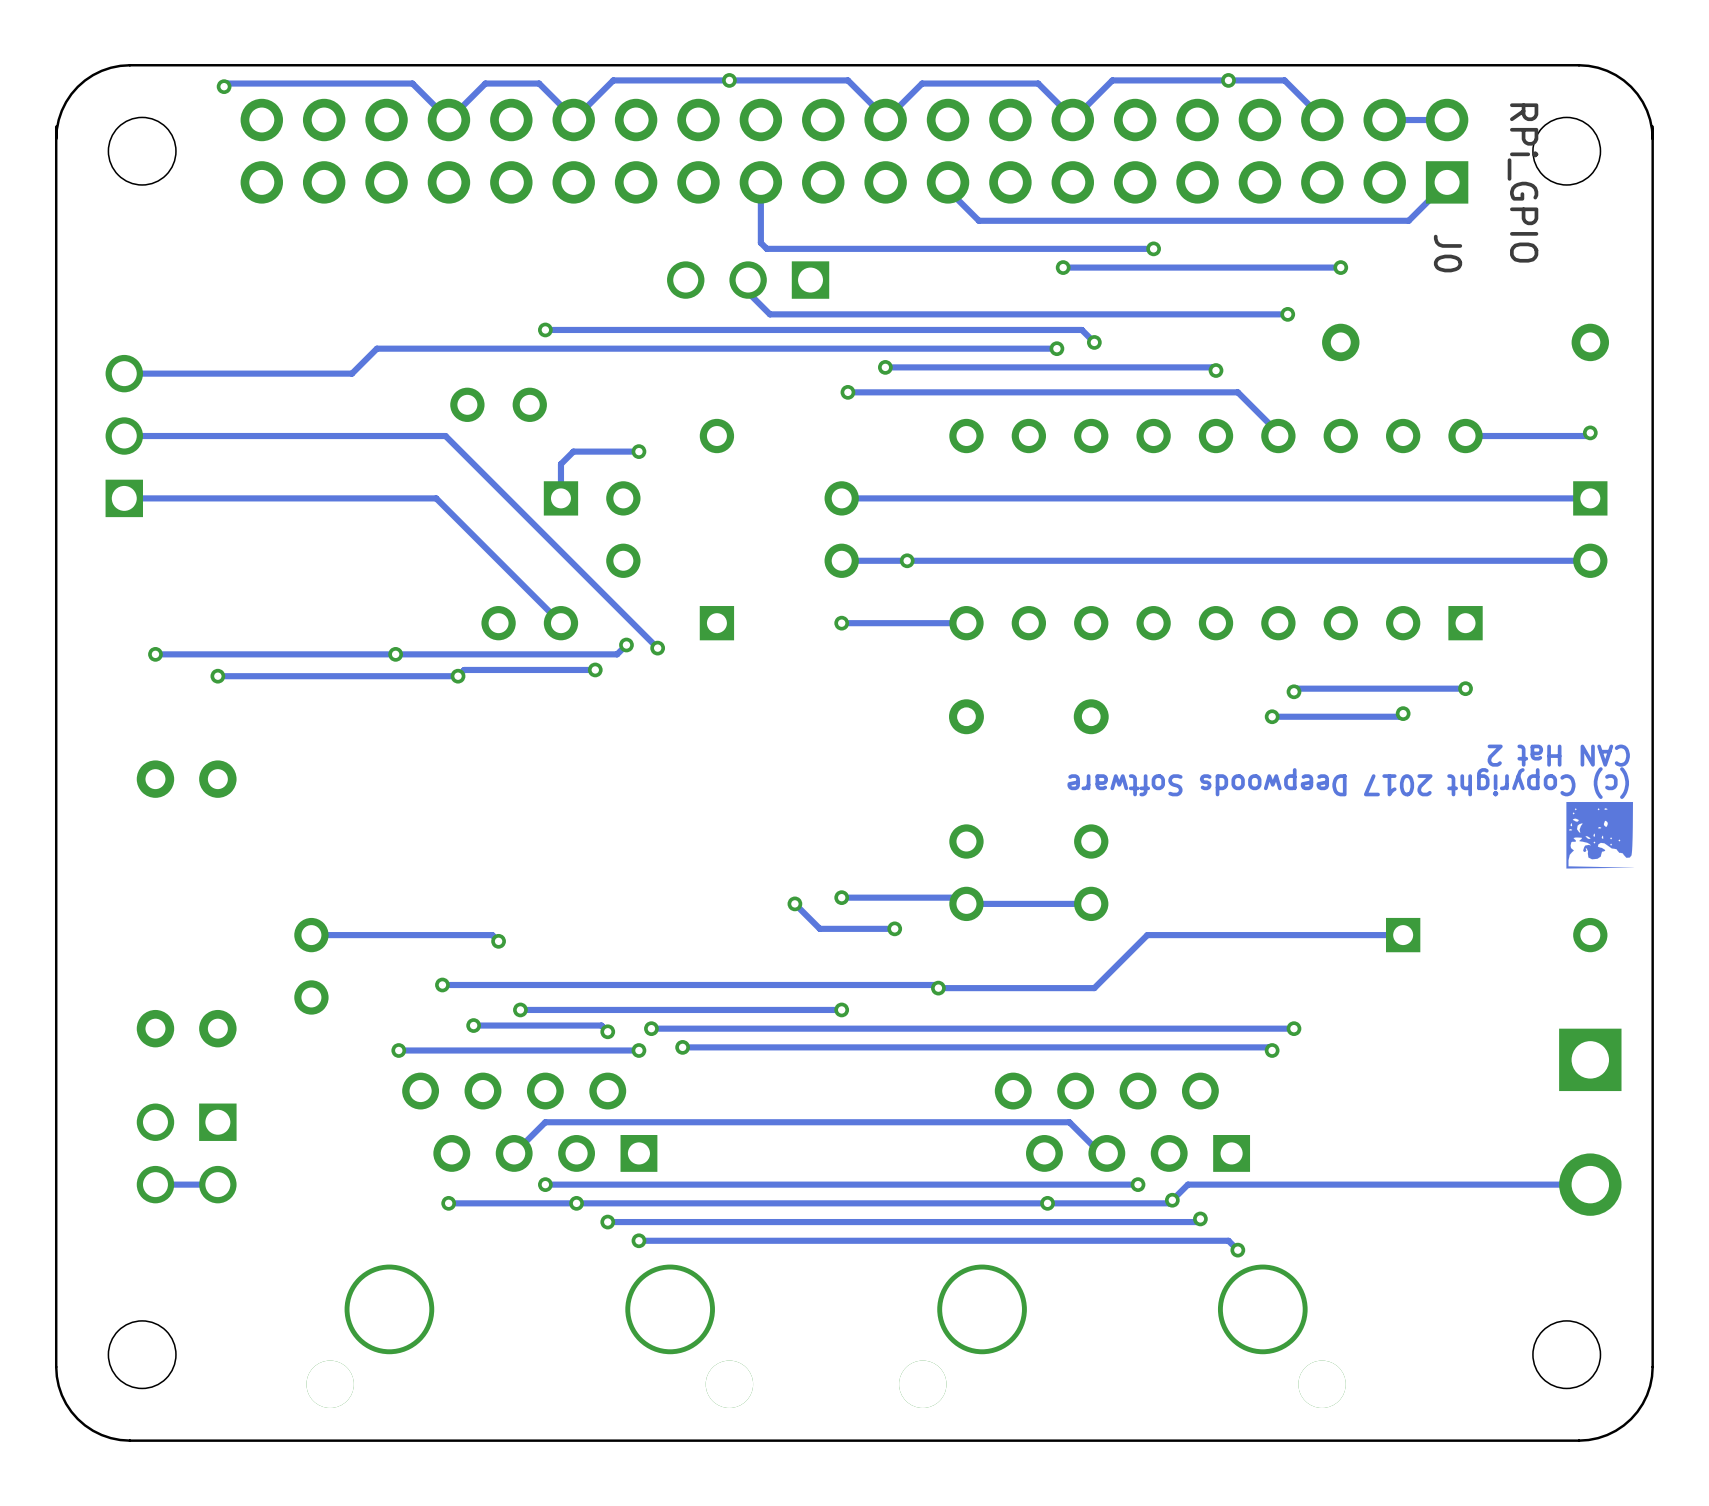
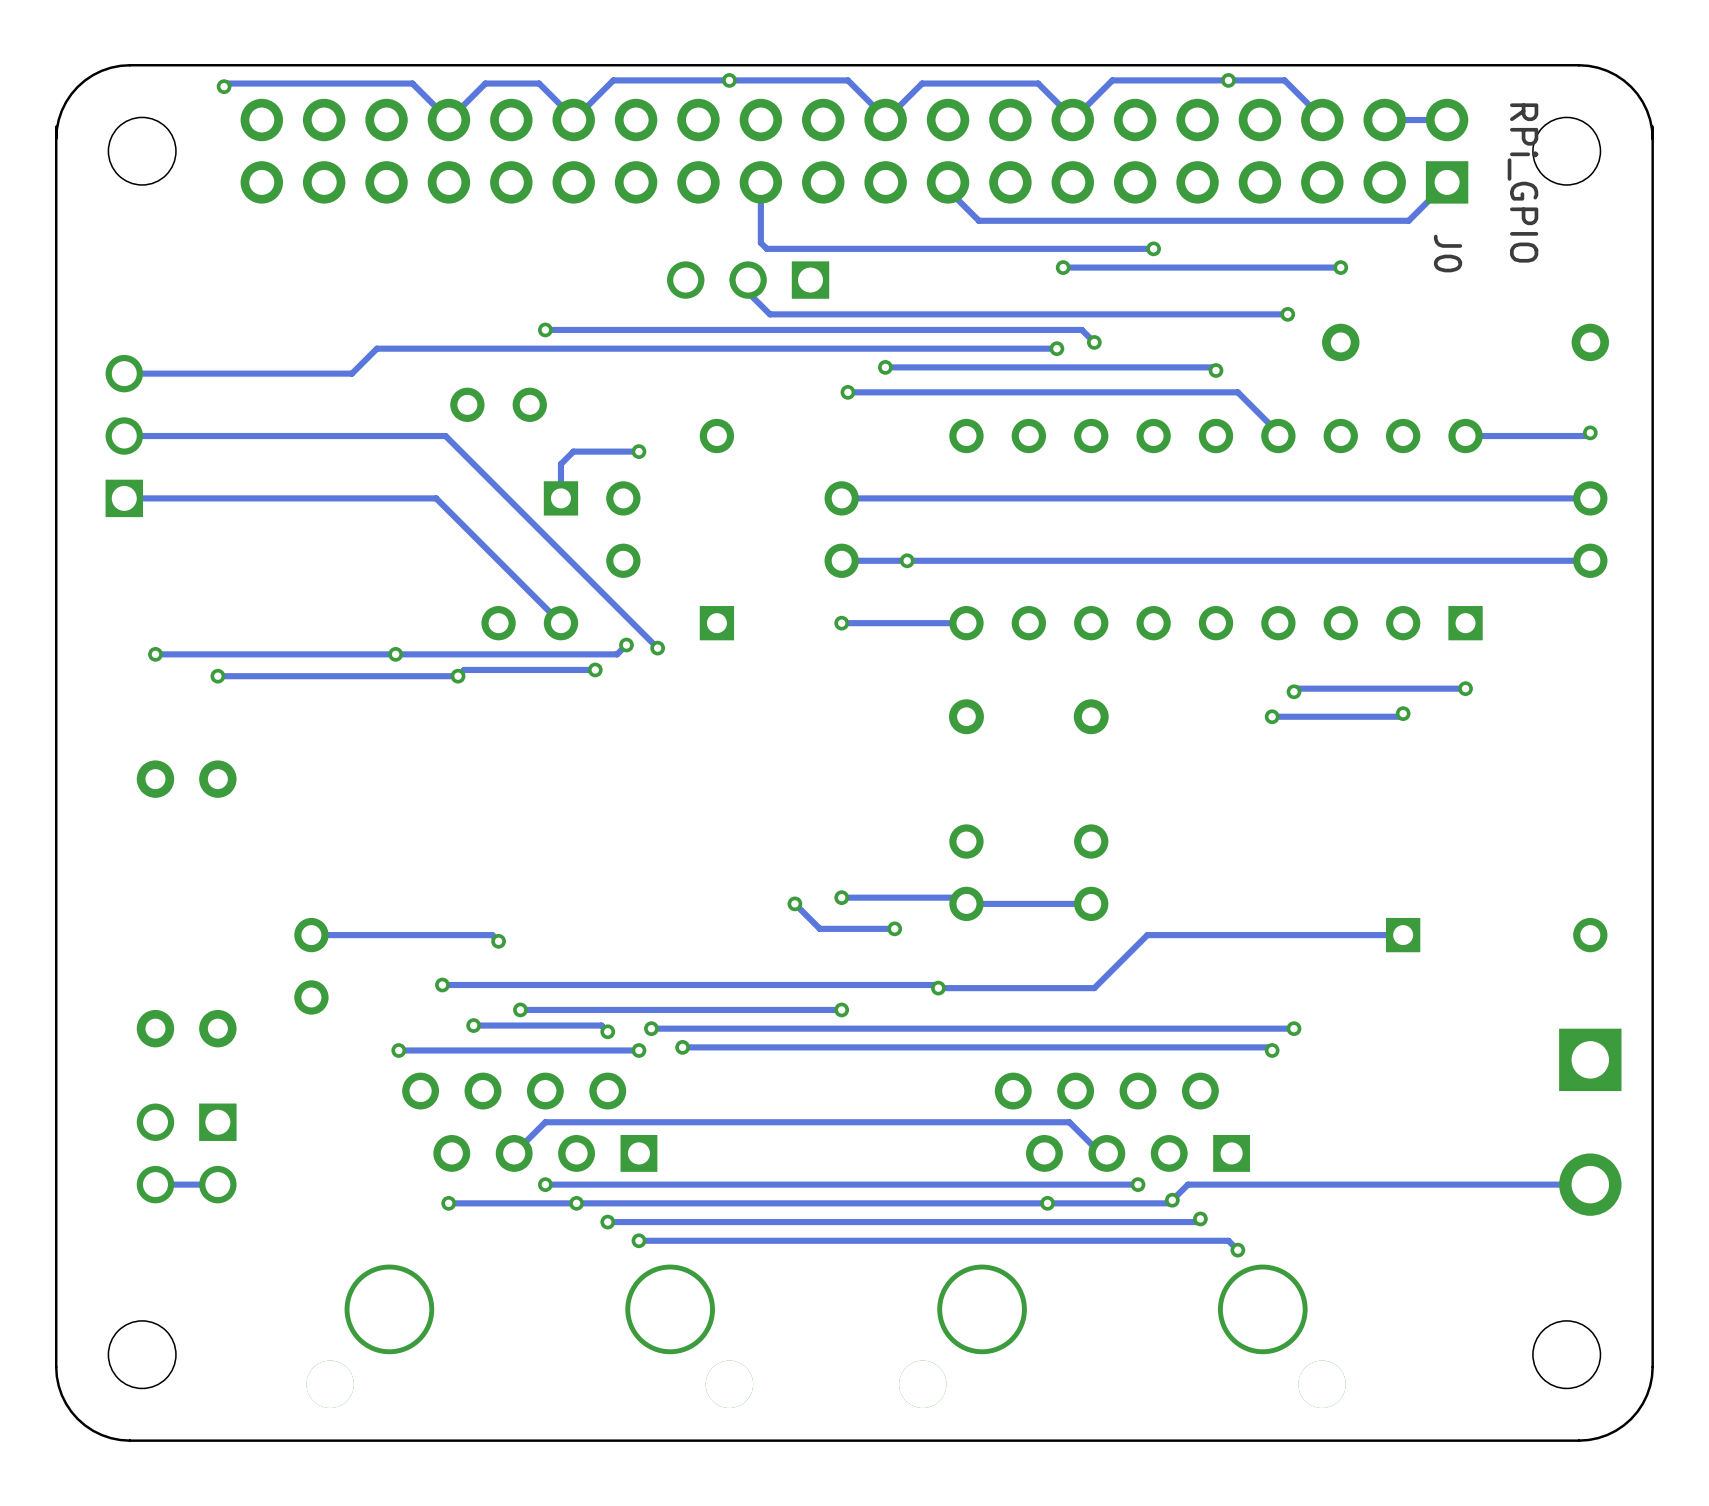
part footprint: [1573, 481, 1608, 578] -> [1573, 481, 1608, 578]
text: CAN Hat 2 (1558, 755) -> none
text: (c) Copyright 2017 Deepwoods Software (1348, 783) -> none
drawing: [1566, 801, 1635, 869] -> none

